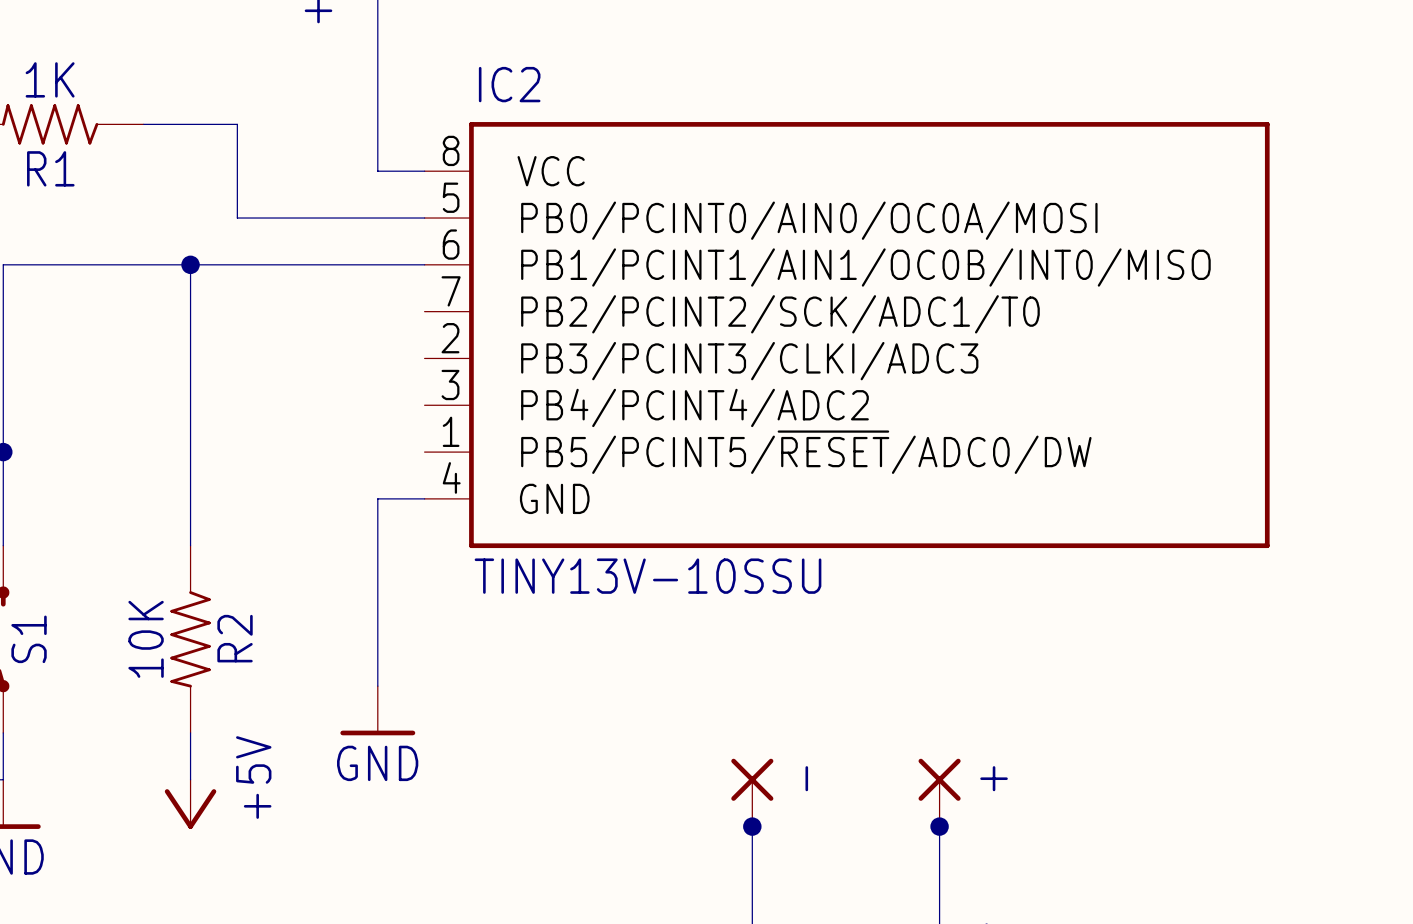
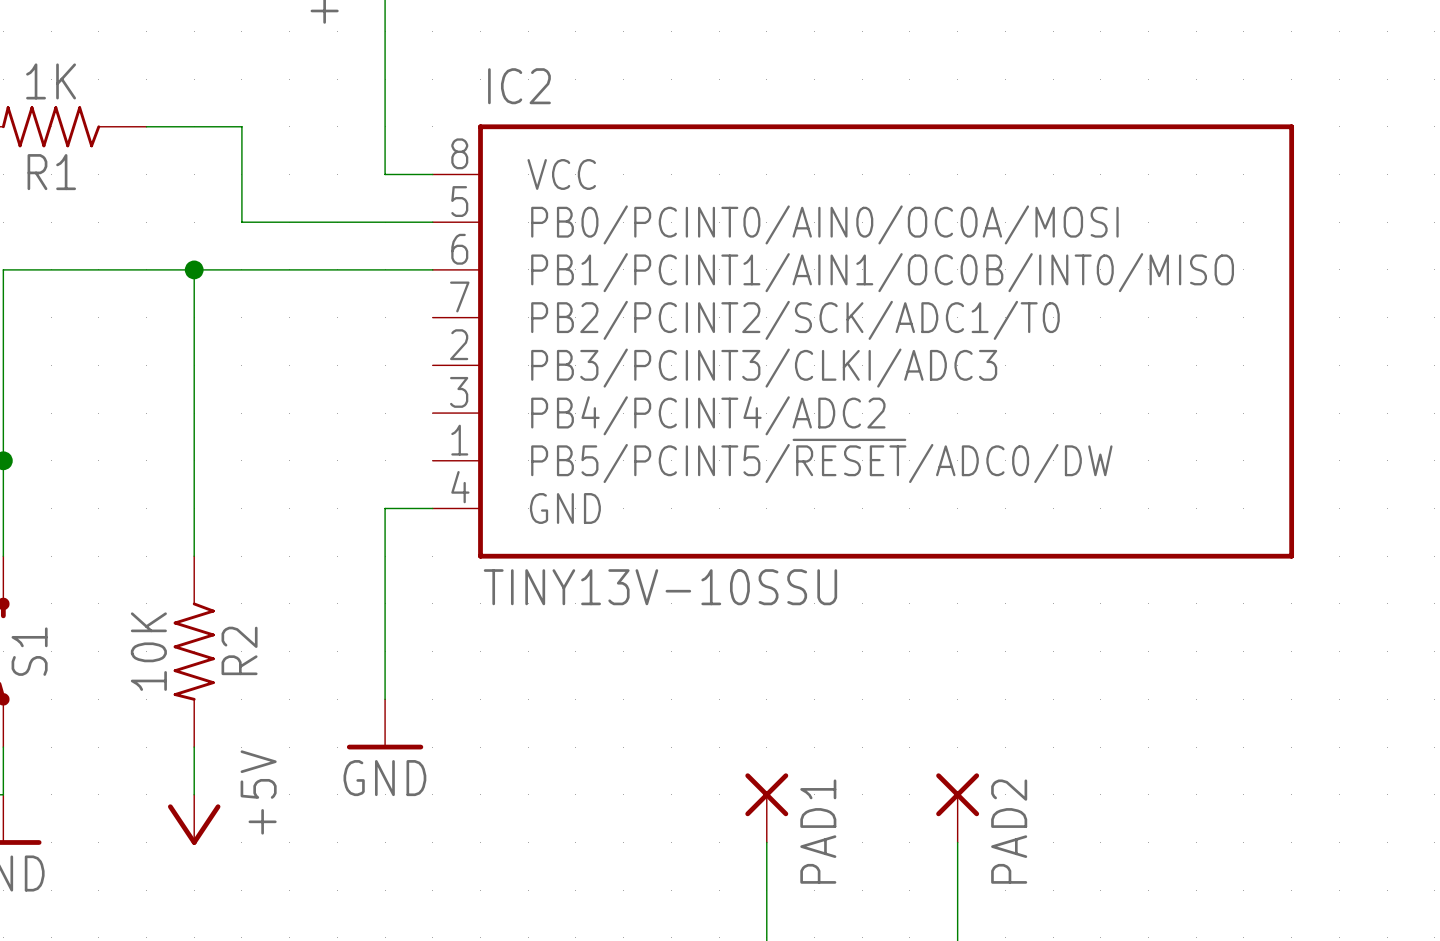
PAD1 name: - (806, 778) -> PAD1 (818, 831)
PAD2 name: + (994, 778) -> PAD2 (1009, 831)
junction: (752, 826) -> none
junction: (939, 826) -> none

